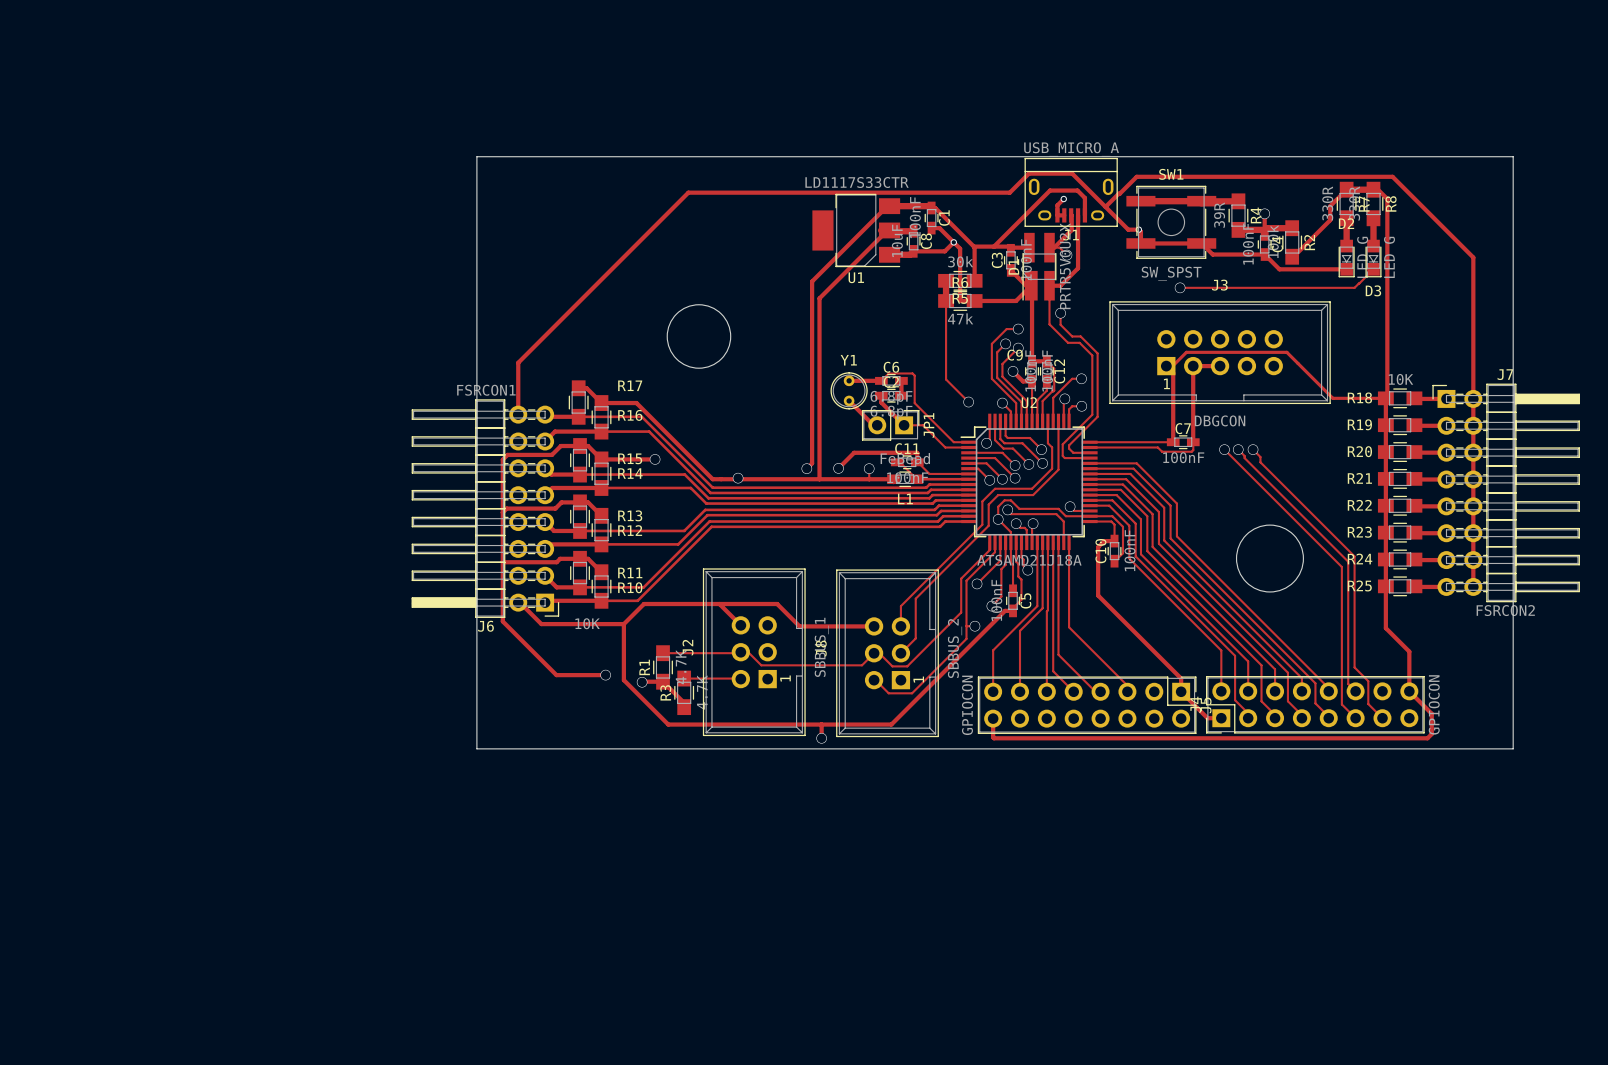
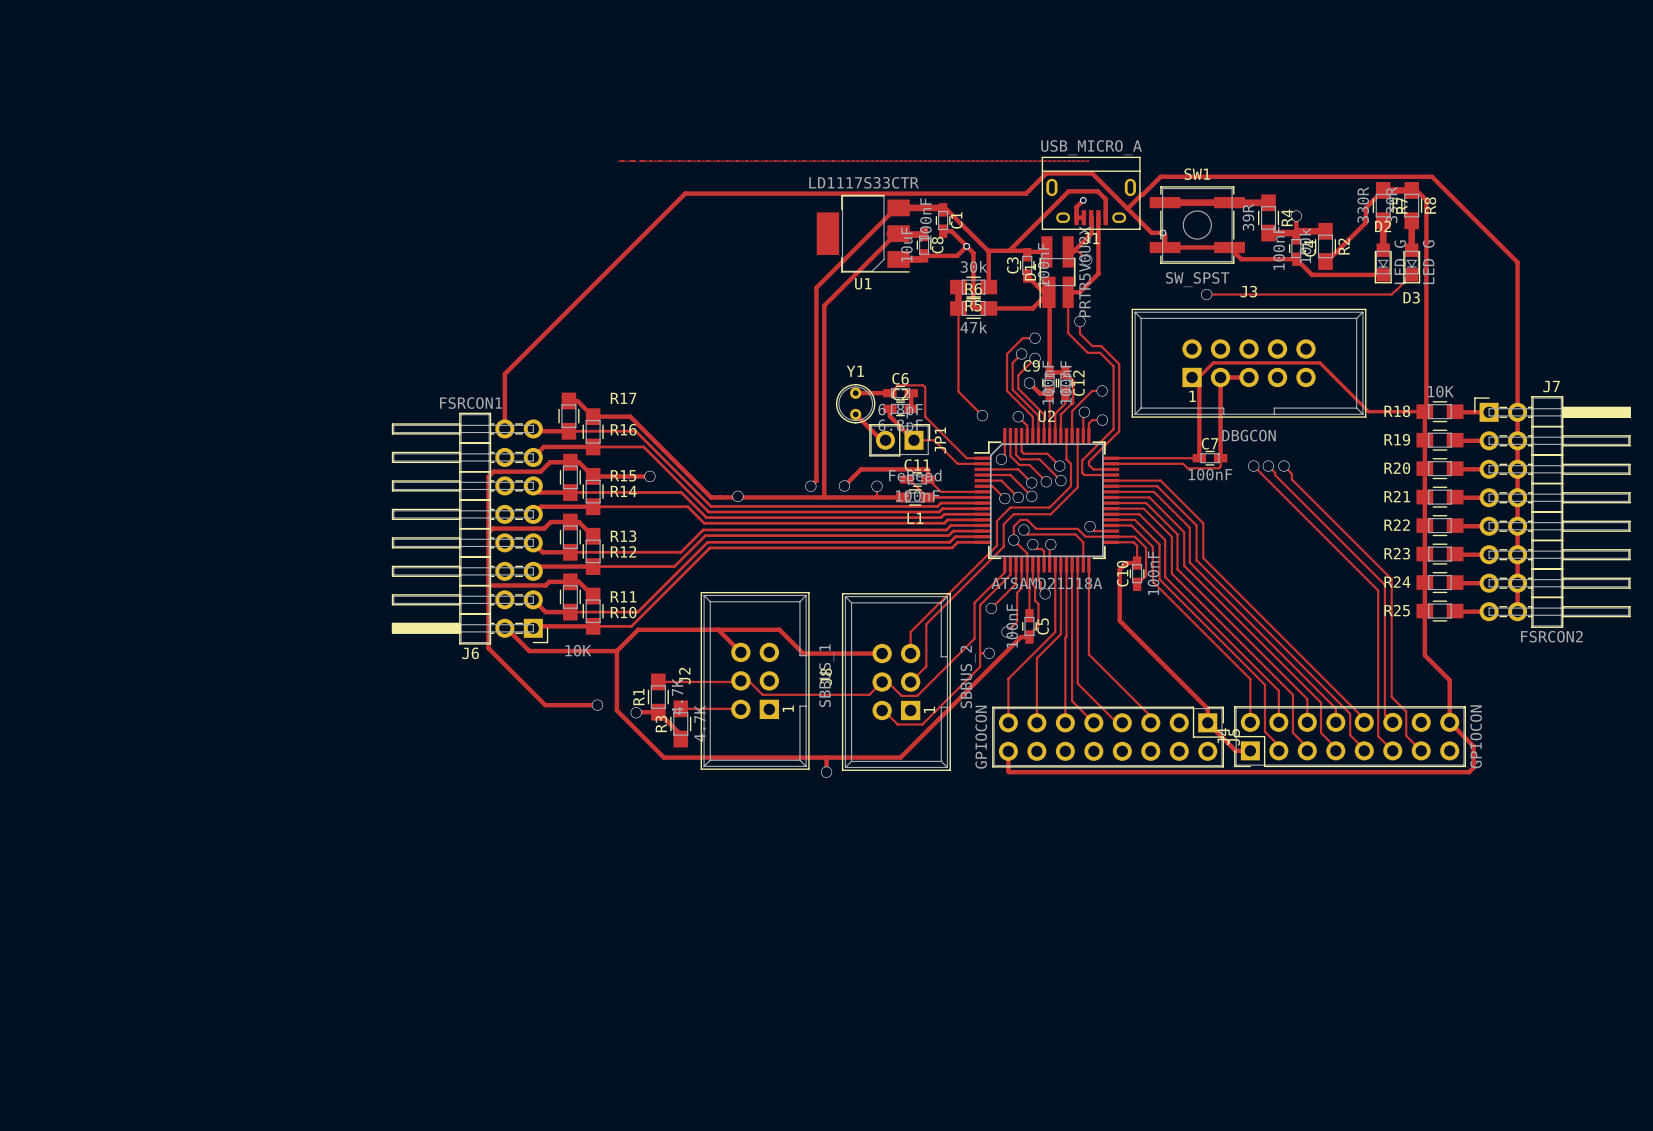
board edge: (476, 156) (1513, 156) (1513, 748) (476, 748) (476, 156) -> none
zone outline: none -> (617, 161) (1088, 161)
round board edge: [666, 304, 732, 369] -> none
round board edge: [1236, 524, 1304, 593] -> none

